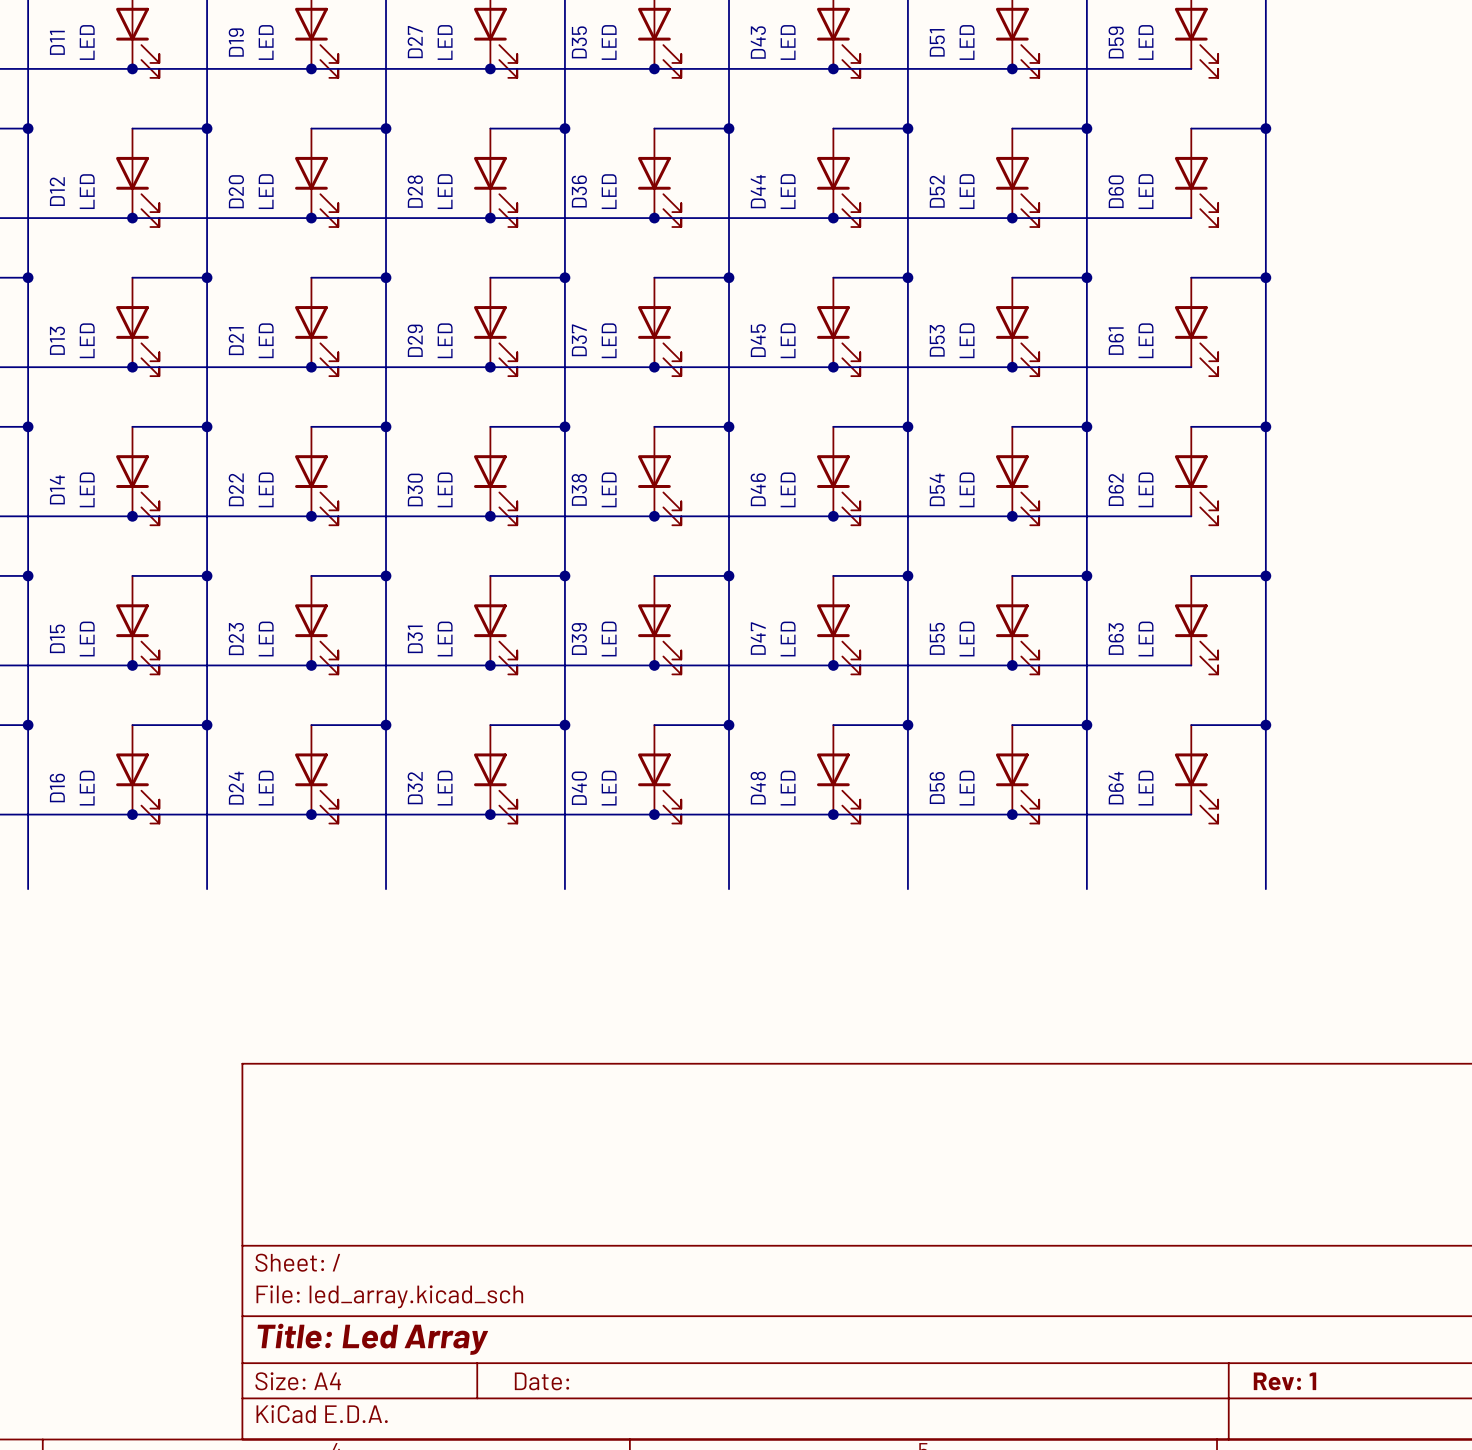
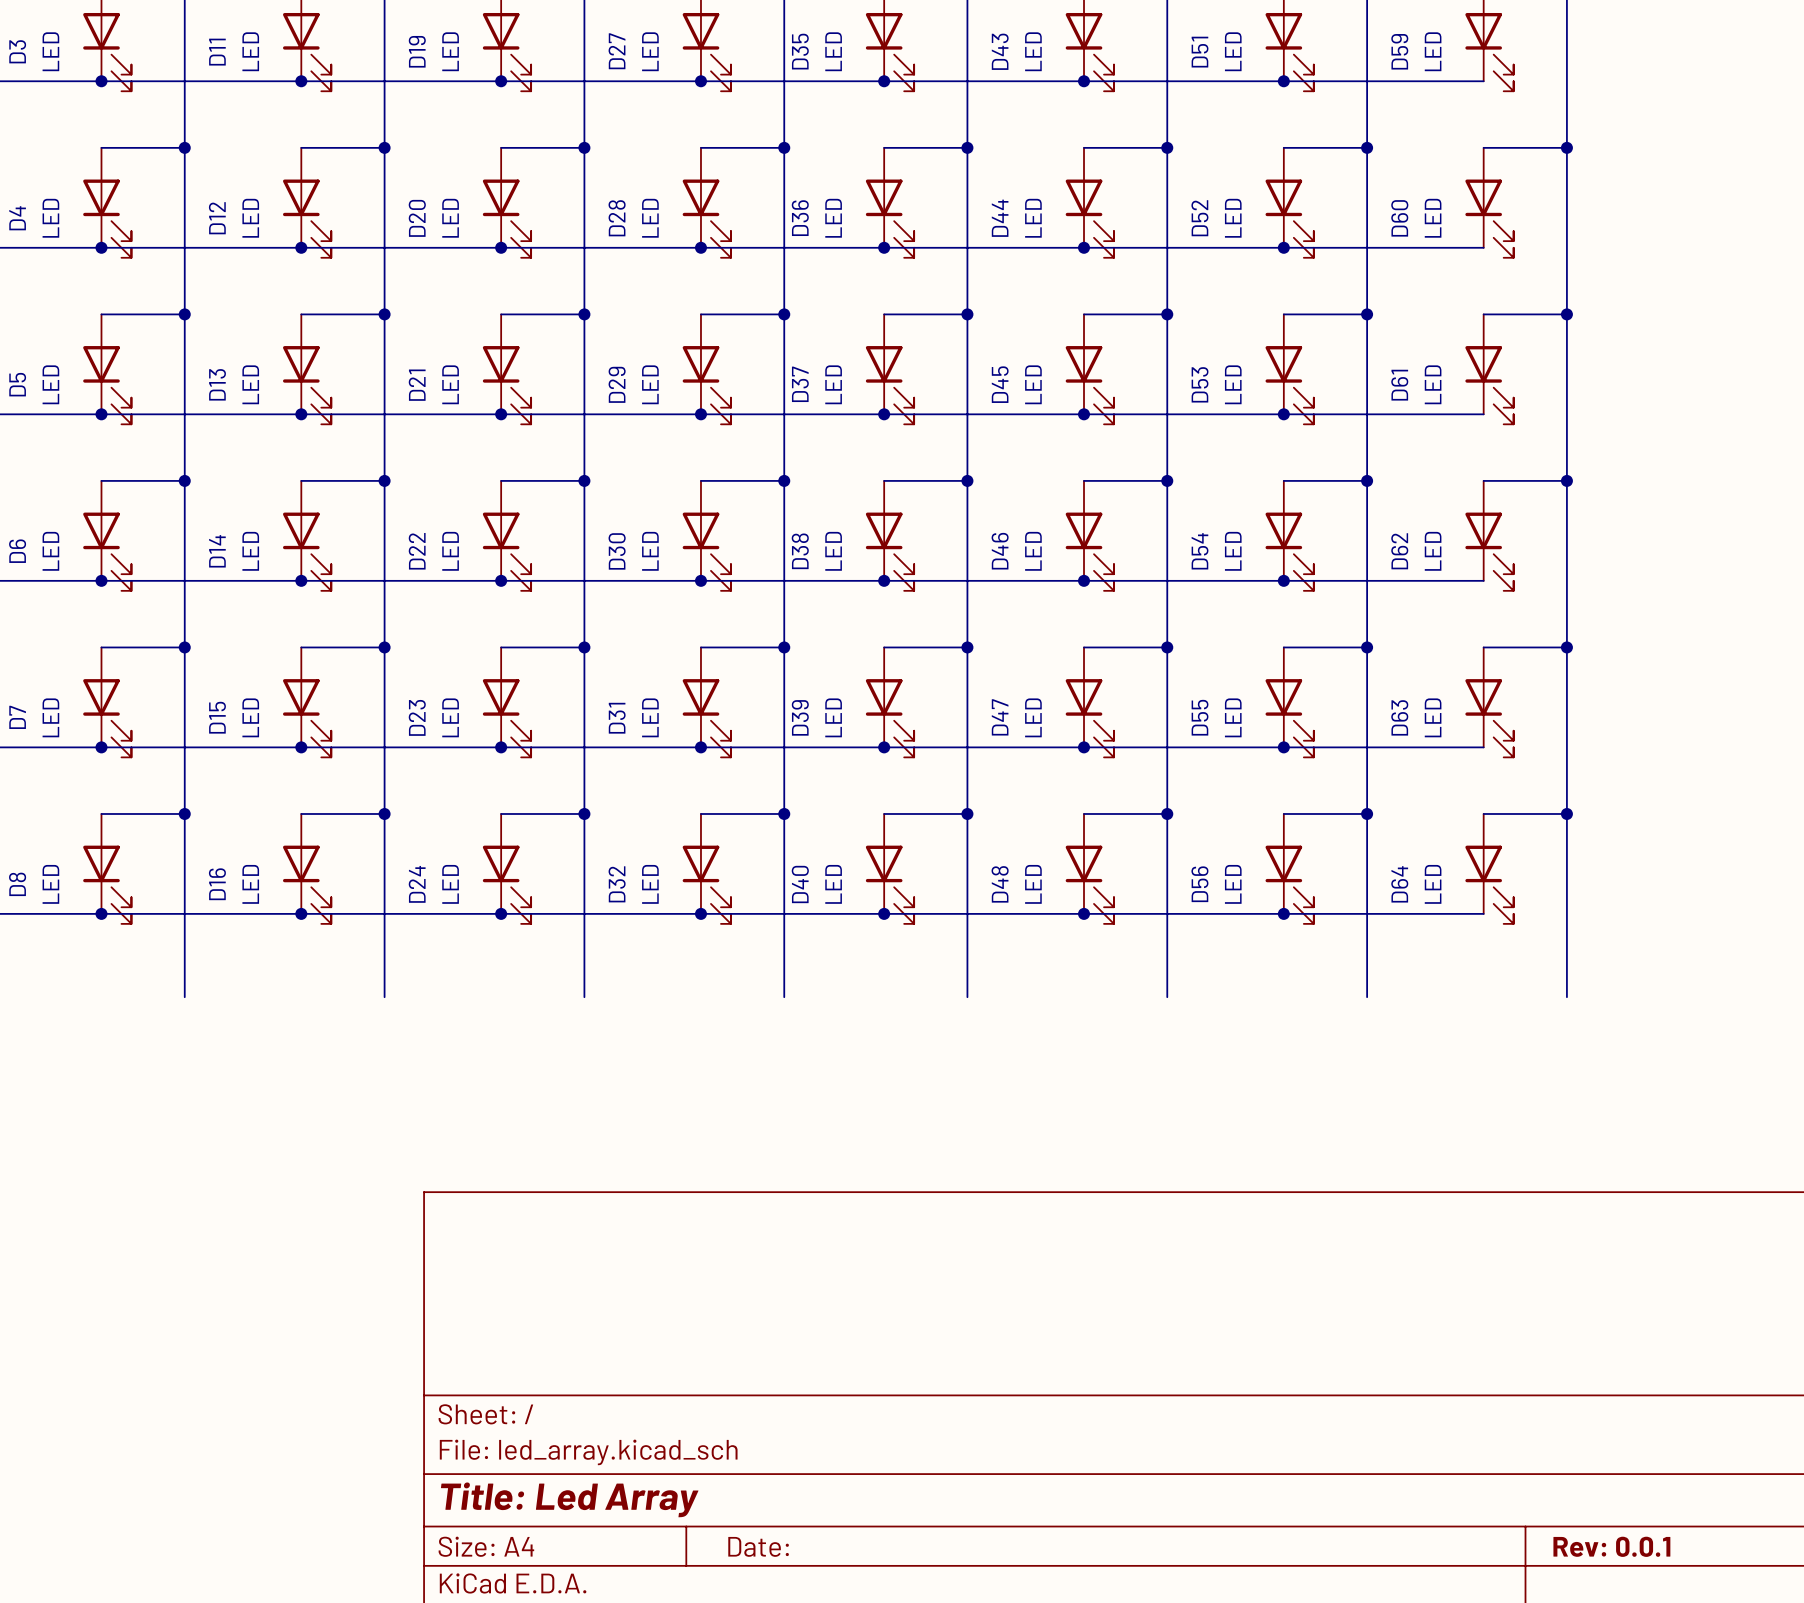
title block: Rev: 1 (1284, 1381) -> Rev: 0.0.1 (1611, 1546)

